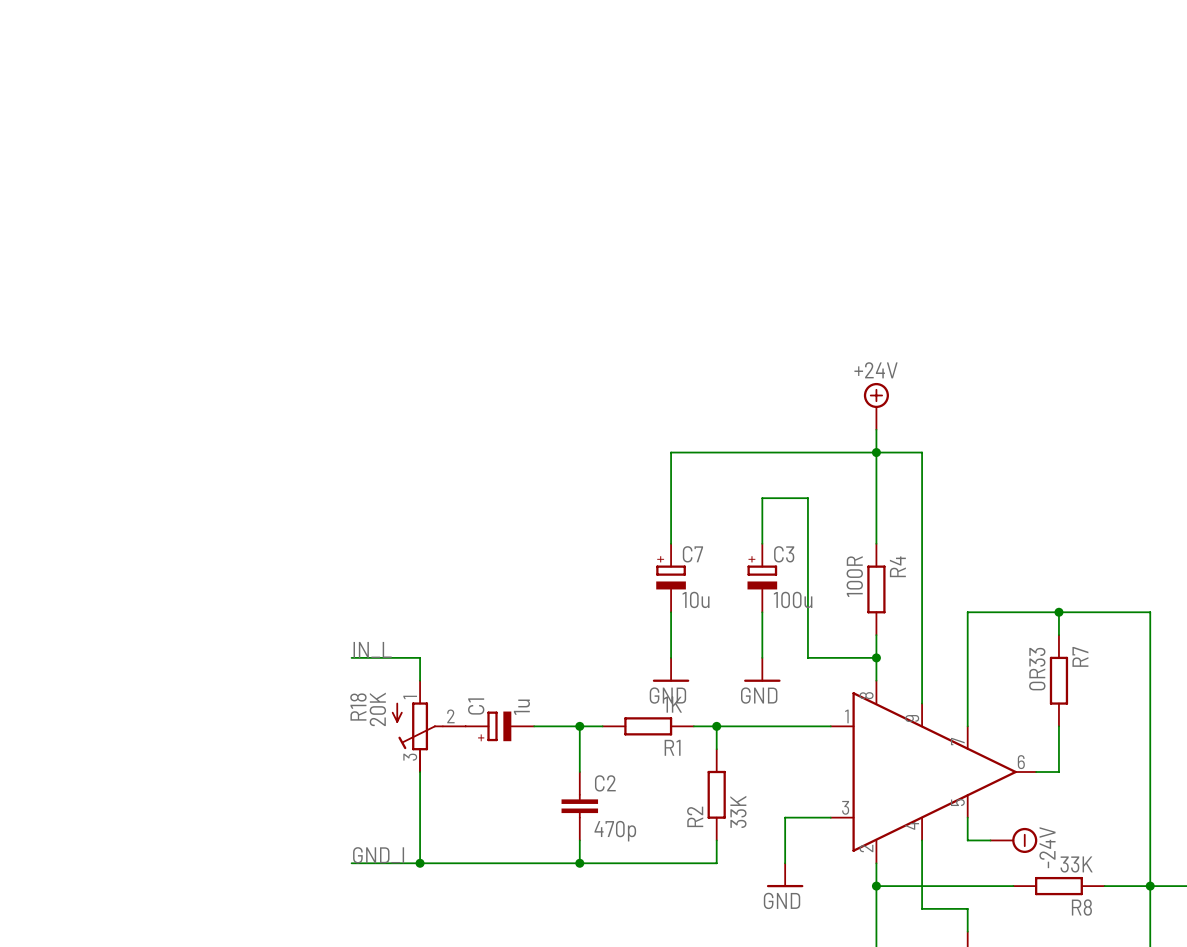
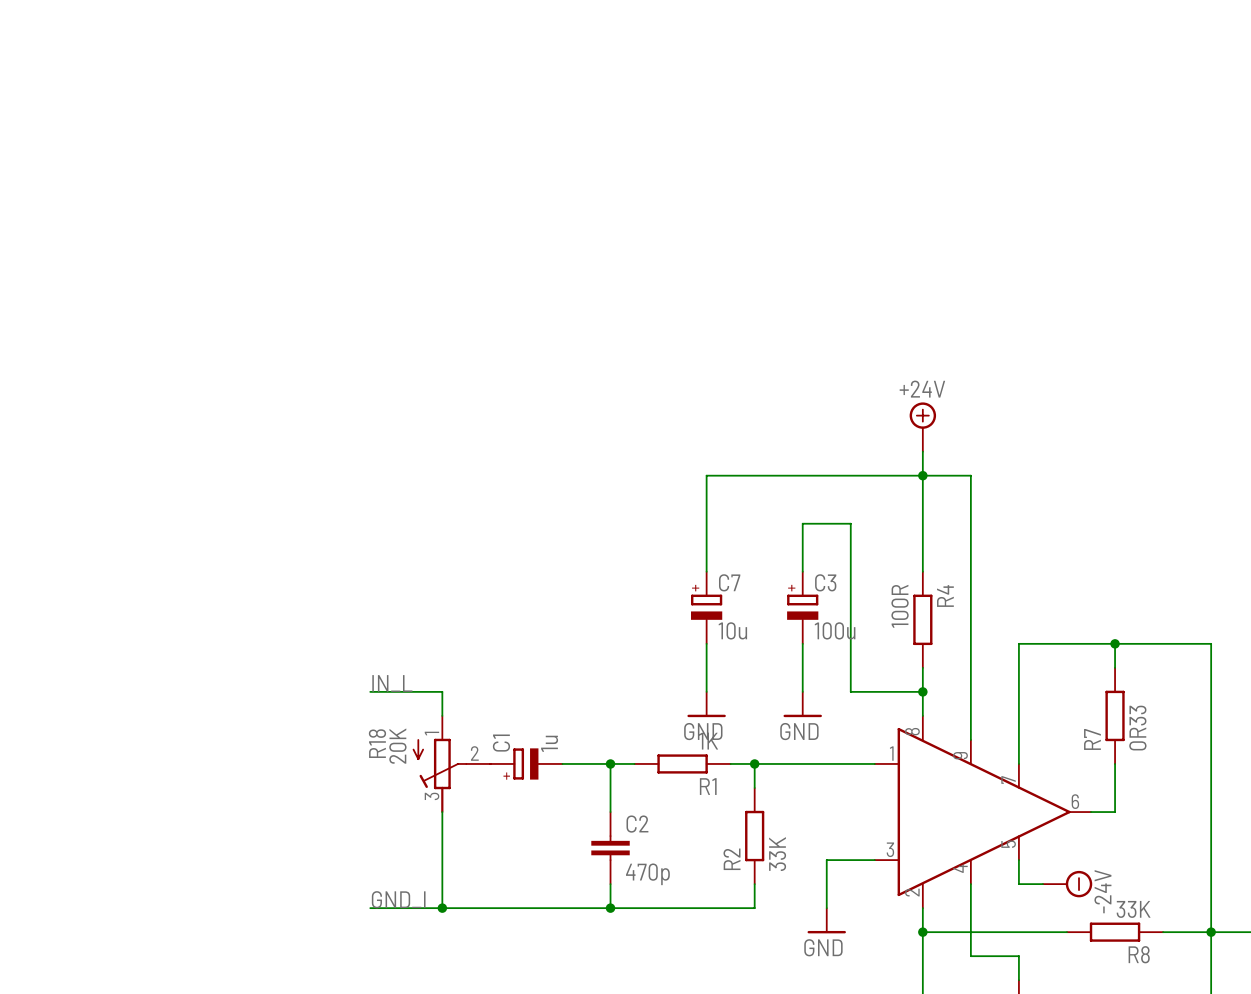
R7 name position: R7 (1080, 656) -> R7 (1092, 739)
R7 value position: 0R33 (1037, 669) -> 0R33 (1137, 728)

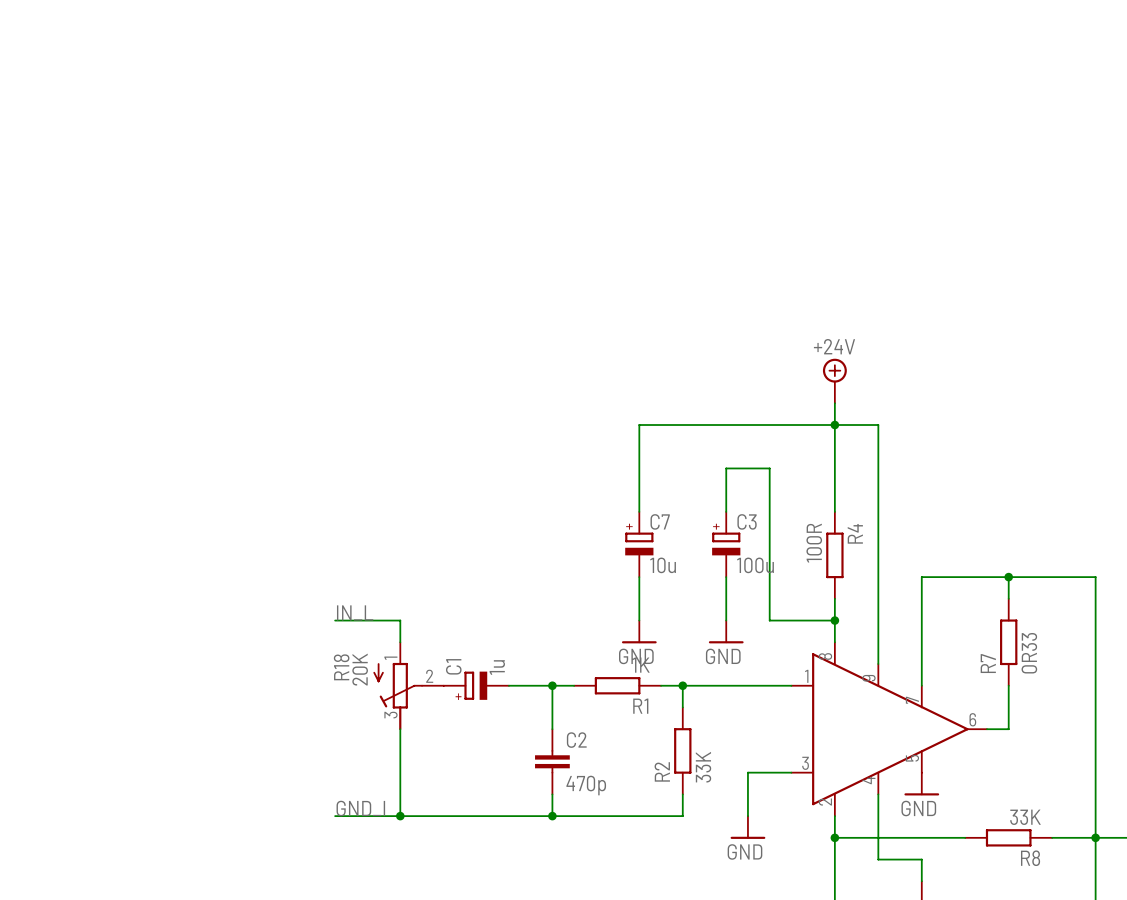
power symbol: none -> GND (921, 784)
power symbol: -24V (1067, 884) -> none

